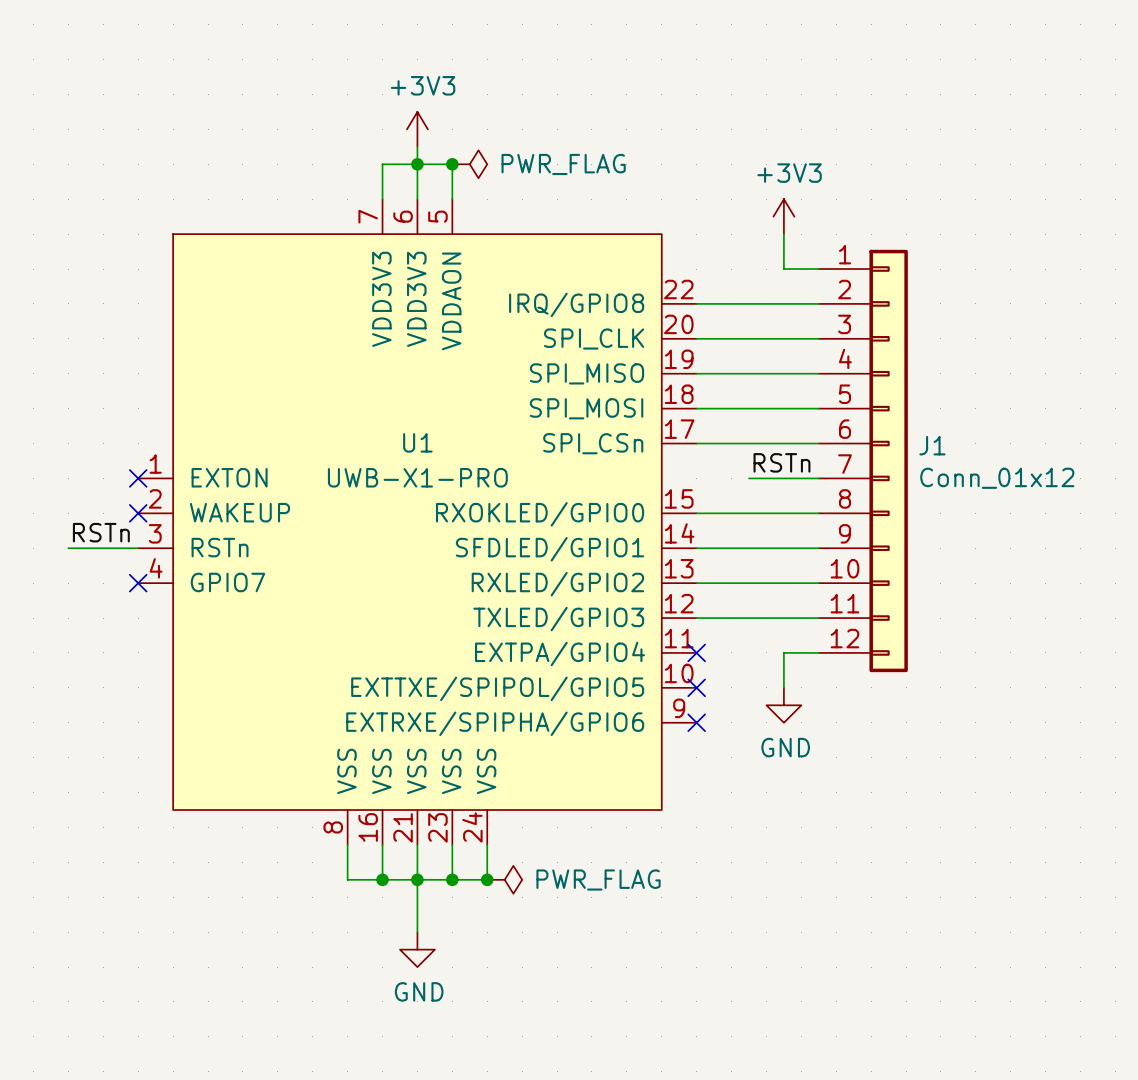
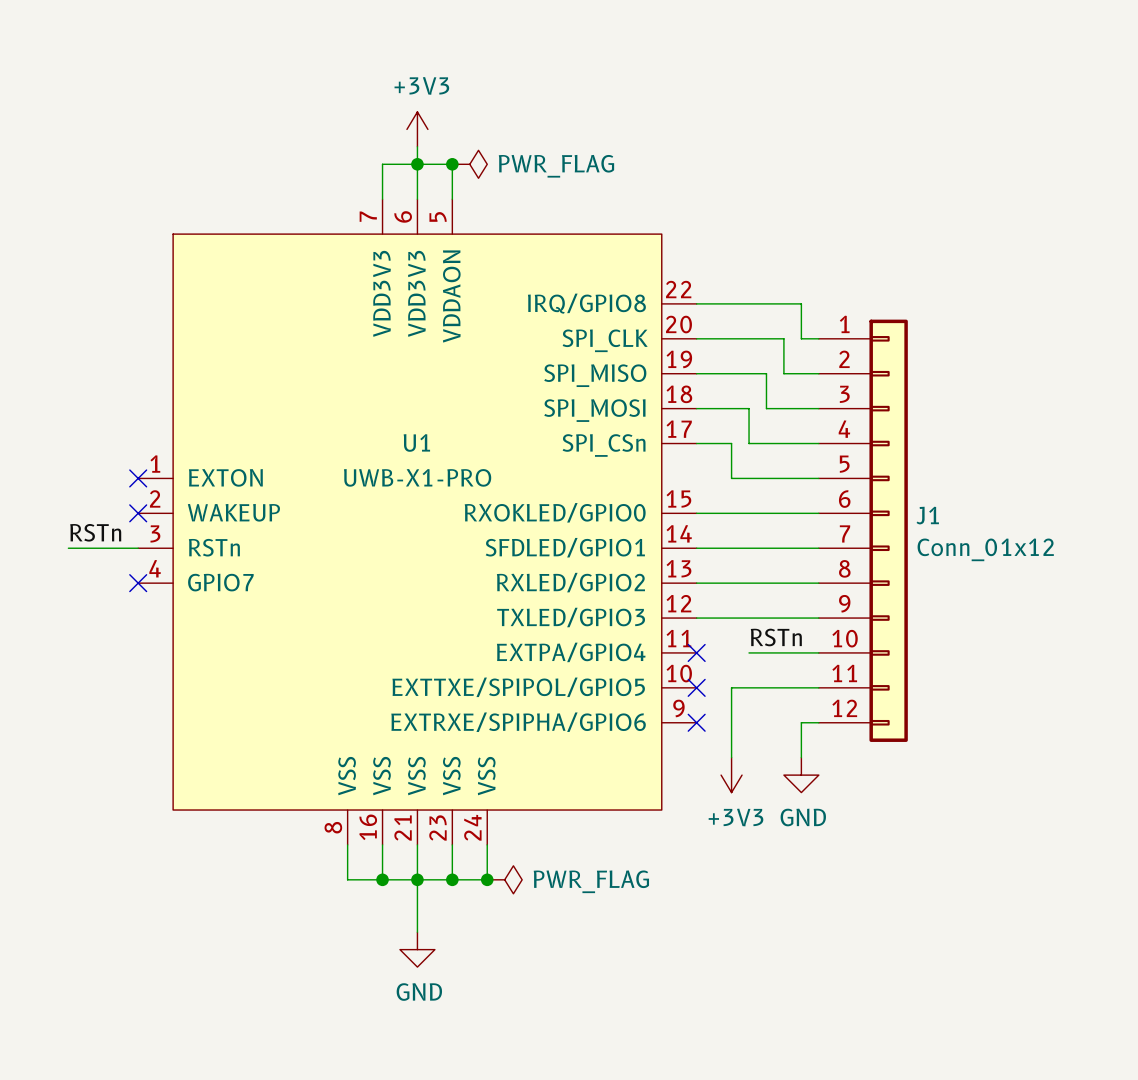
power symbol: +3V3 (783, 216) -> none
wire: (783, 234) (783, 269) (818, 269) -> none
wire: (801, 303) (818, 303) -> none
wire: (783, 338) (801, 338) -> (801, 303) (801, 338)
wire: (766, 373) (783, 373) -> (783, 338) (783, 373)
wire: none -> (766, 373) (766, 408)
wire: (749, 408) (766, 408) -> (749, 408) (749, 443)
wire: (731, 443) (749, 443) -> (731, 443) (731, 478) (749, 478)
J1 position: (863, 460) -> (863, 530)
label position: RSTn (781, 462) -> RSTn (776, 637)
wire: (783, 652) (783, 687) -> (783, 652) (749, 652)
wire: none -> (818, 687) (731, 687) (731, 757)
power symbol position: GND (783, 705) -> GND (801, 775)
wire: none -> (818, 722) (801, 722) (801, 757)
power symbol: none -> +3V3 (731, 775)

